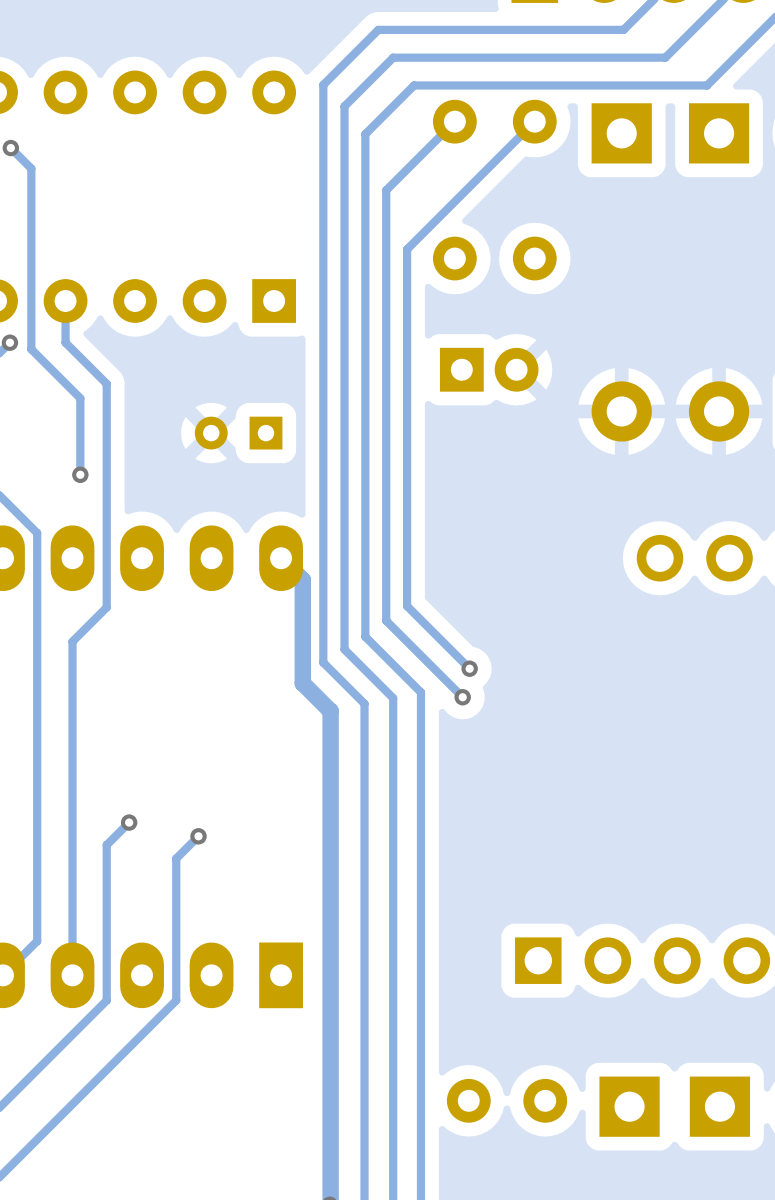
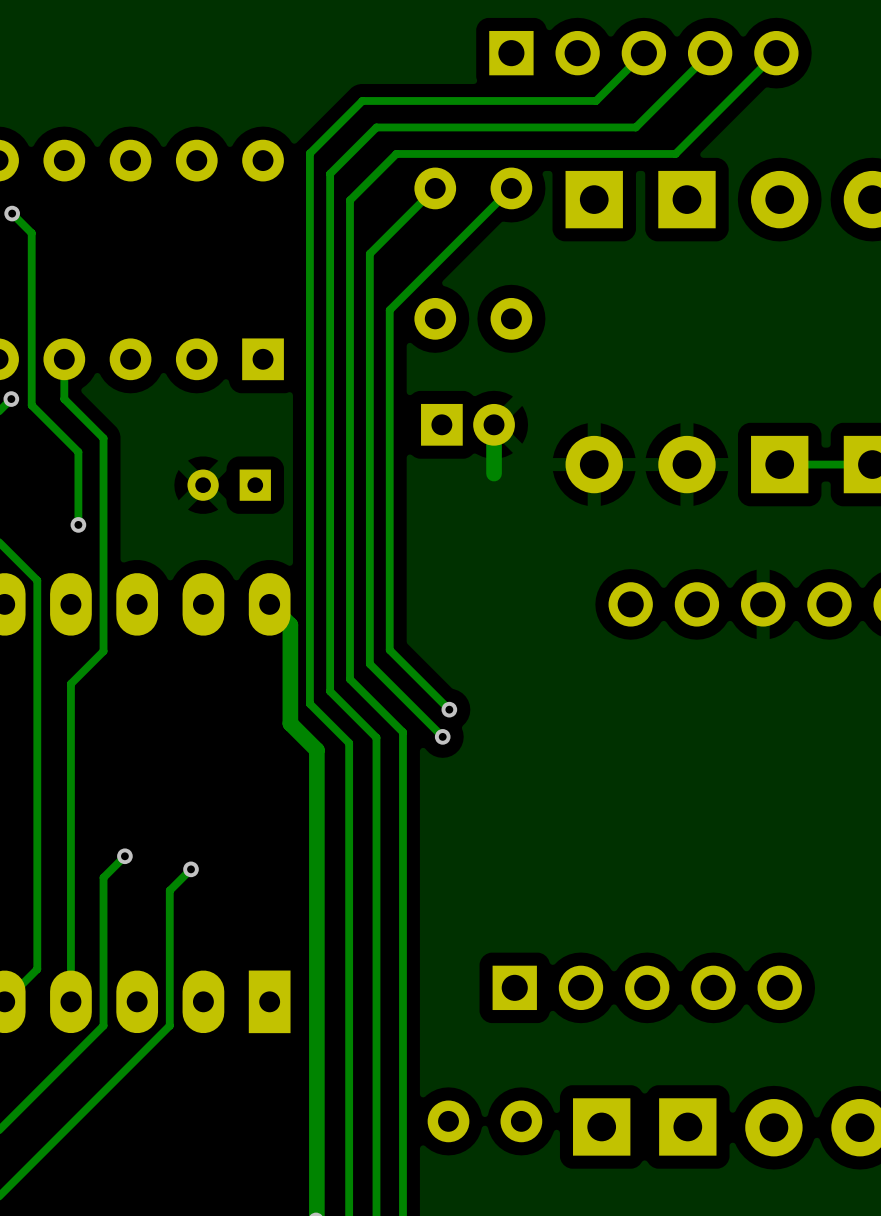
track: none -> (494, 424) (494, 473)

